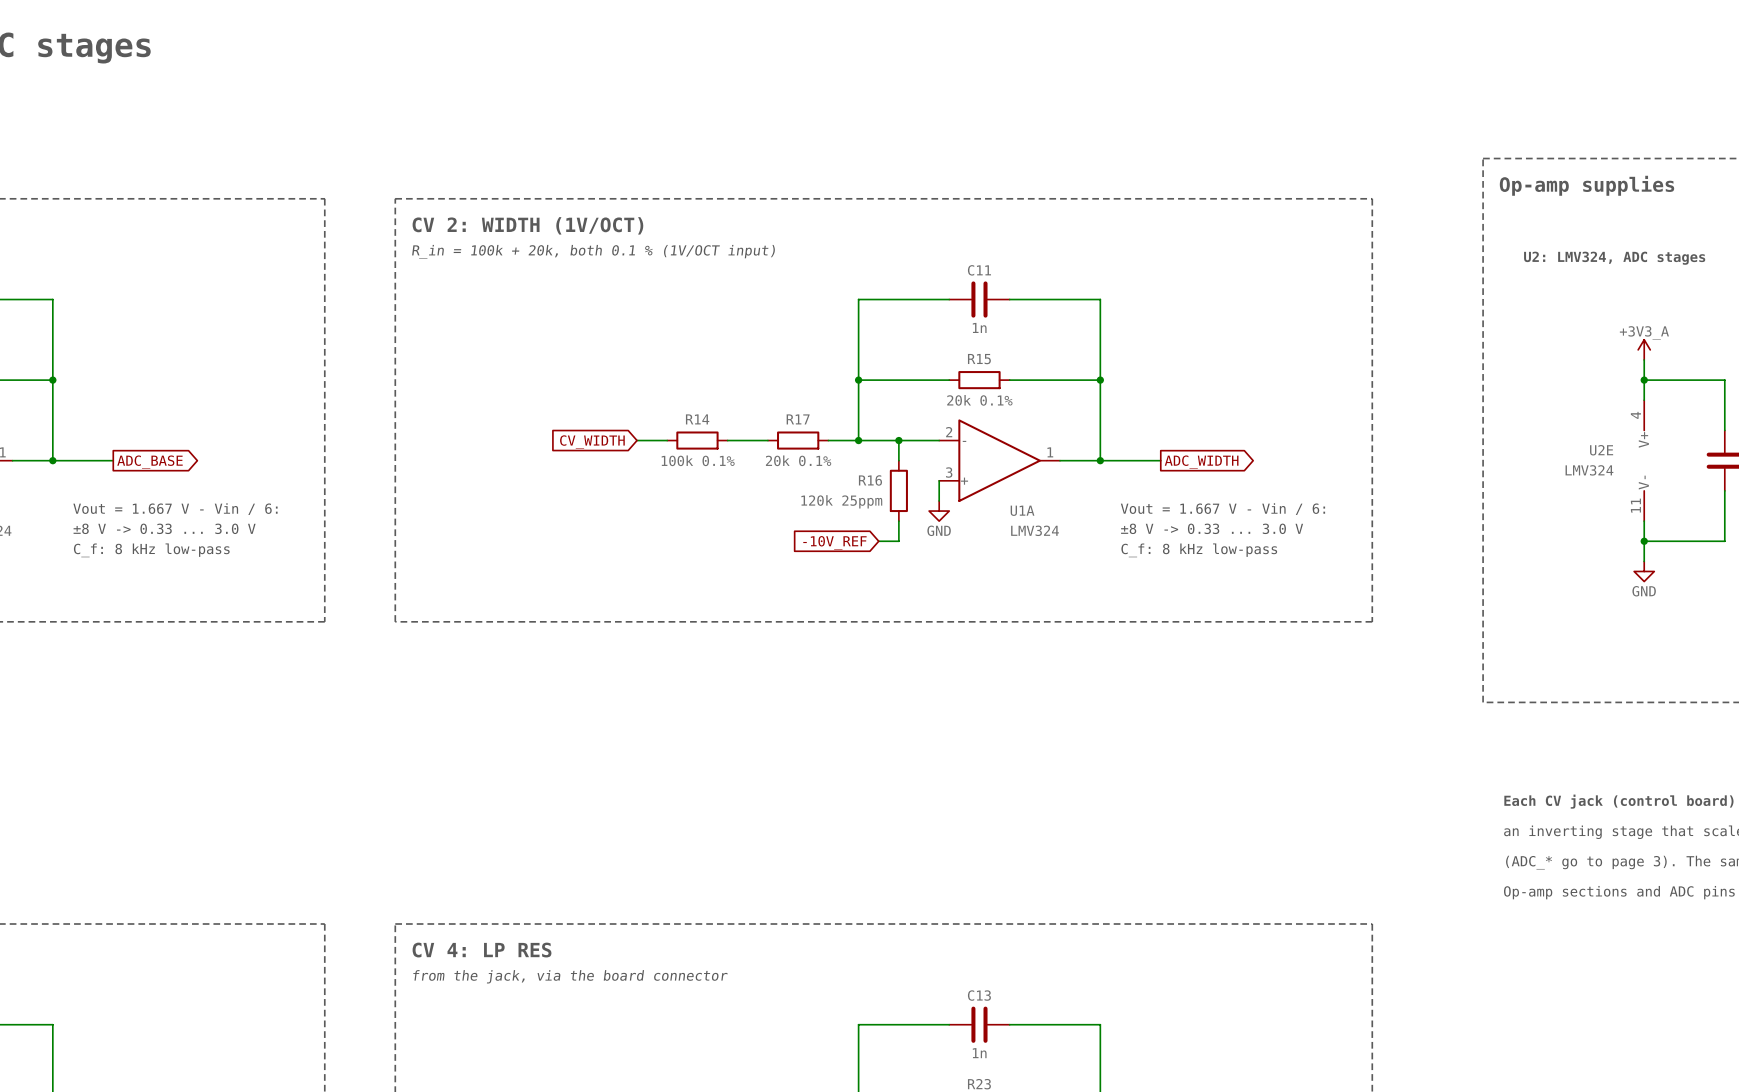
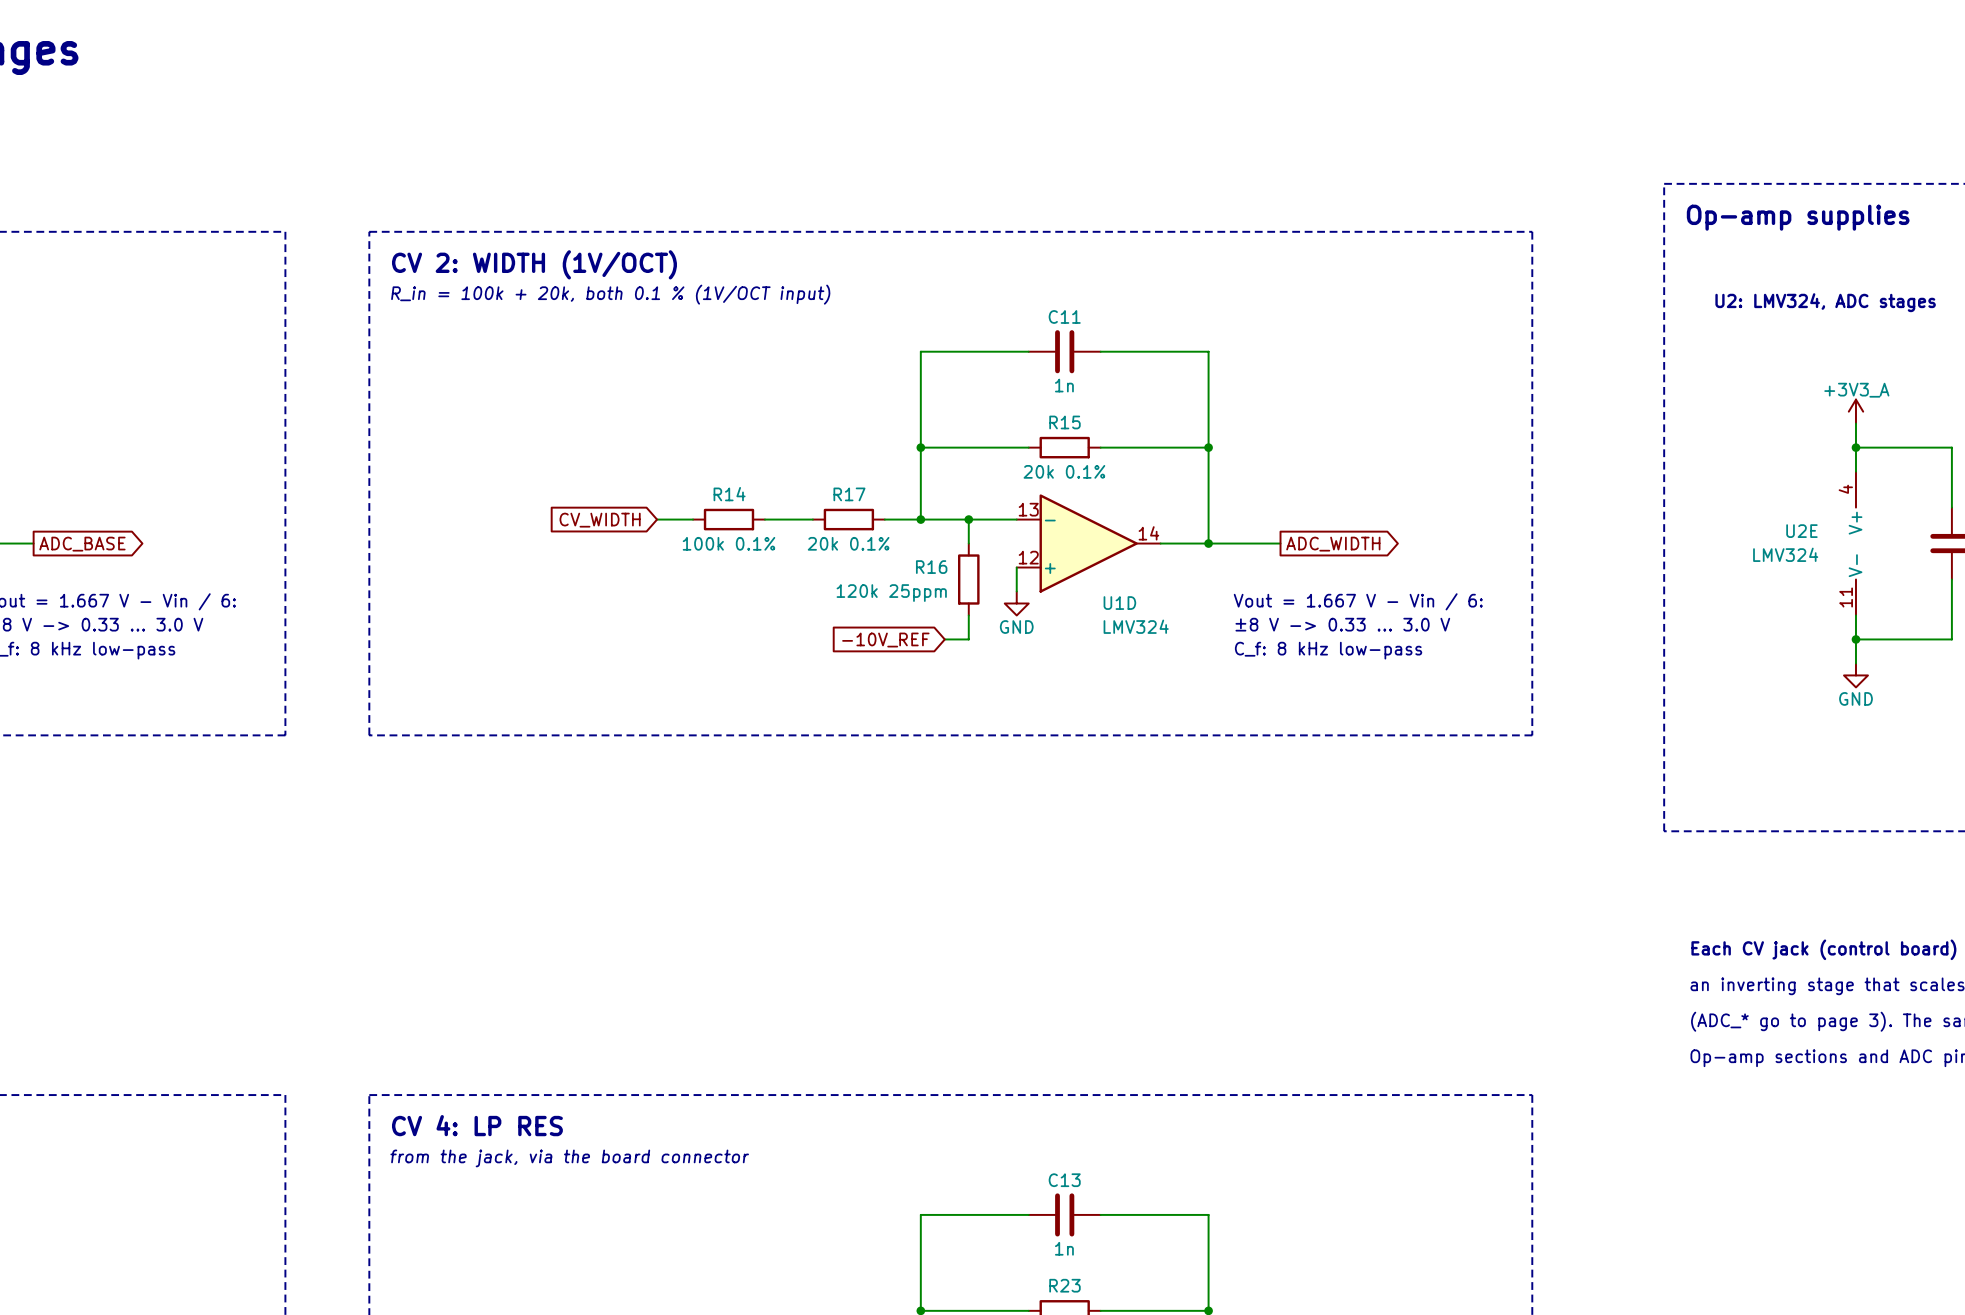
U1A pin number: 2 (949, 432) -> 13 (1028, 509)
U1A pin number: 1 (1050, 452) -> 14 (1148, 533)
U1A pin number: 3 (949, 472) -> 12 (1028, 557)
U1A name: U1A (1022, 510) -> U1D (1119, 603)

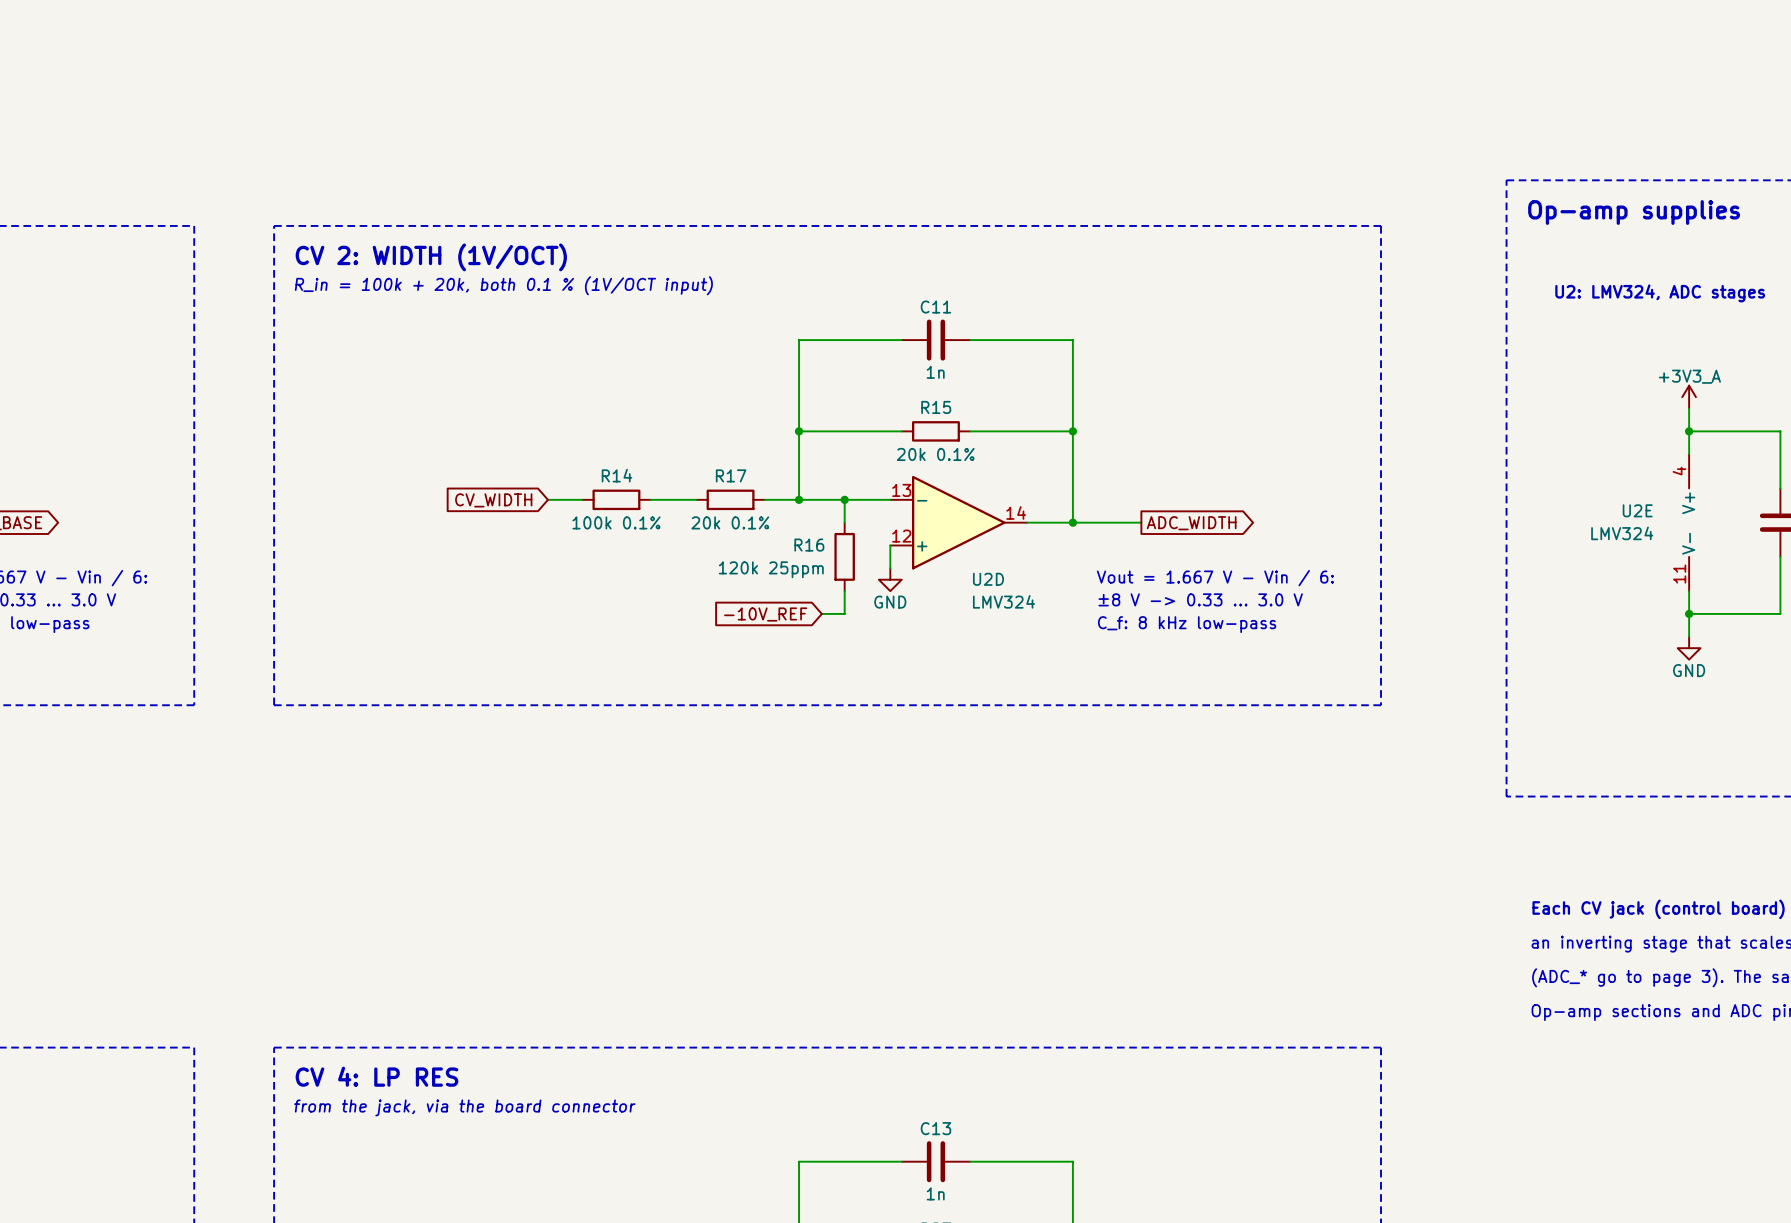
U1D name: U1D (1119, 603) -> U2D (988, 579)

